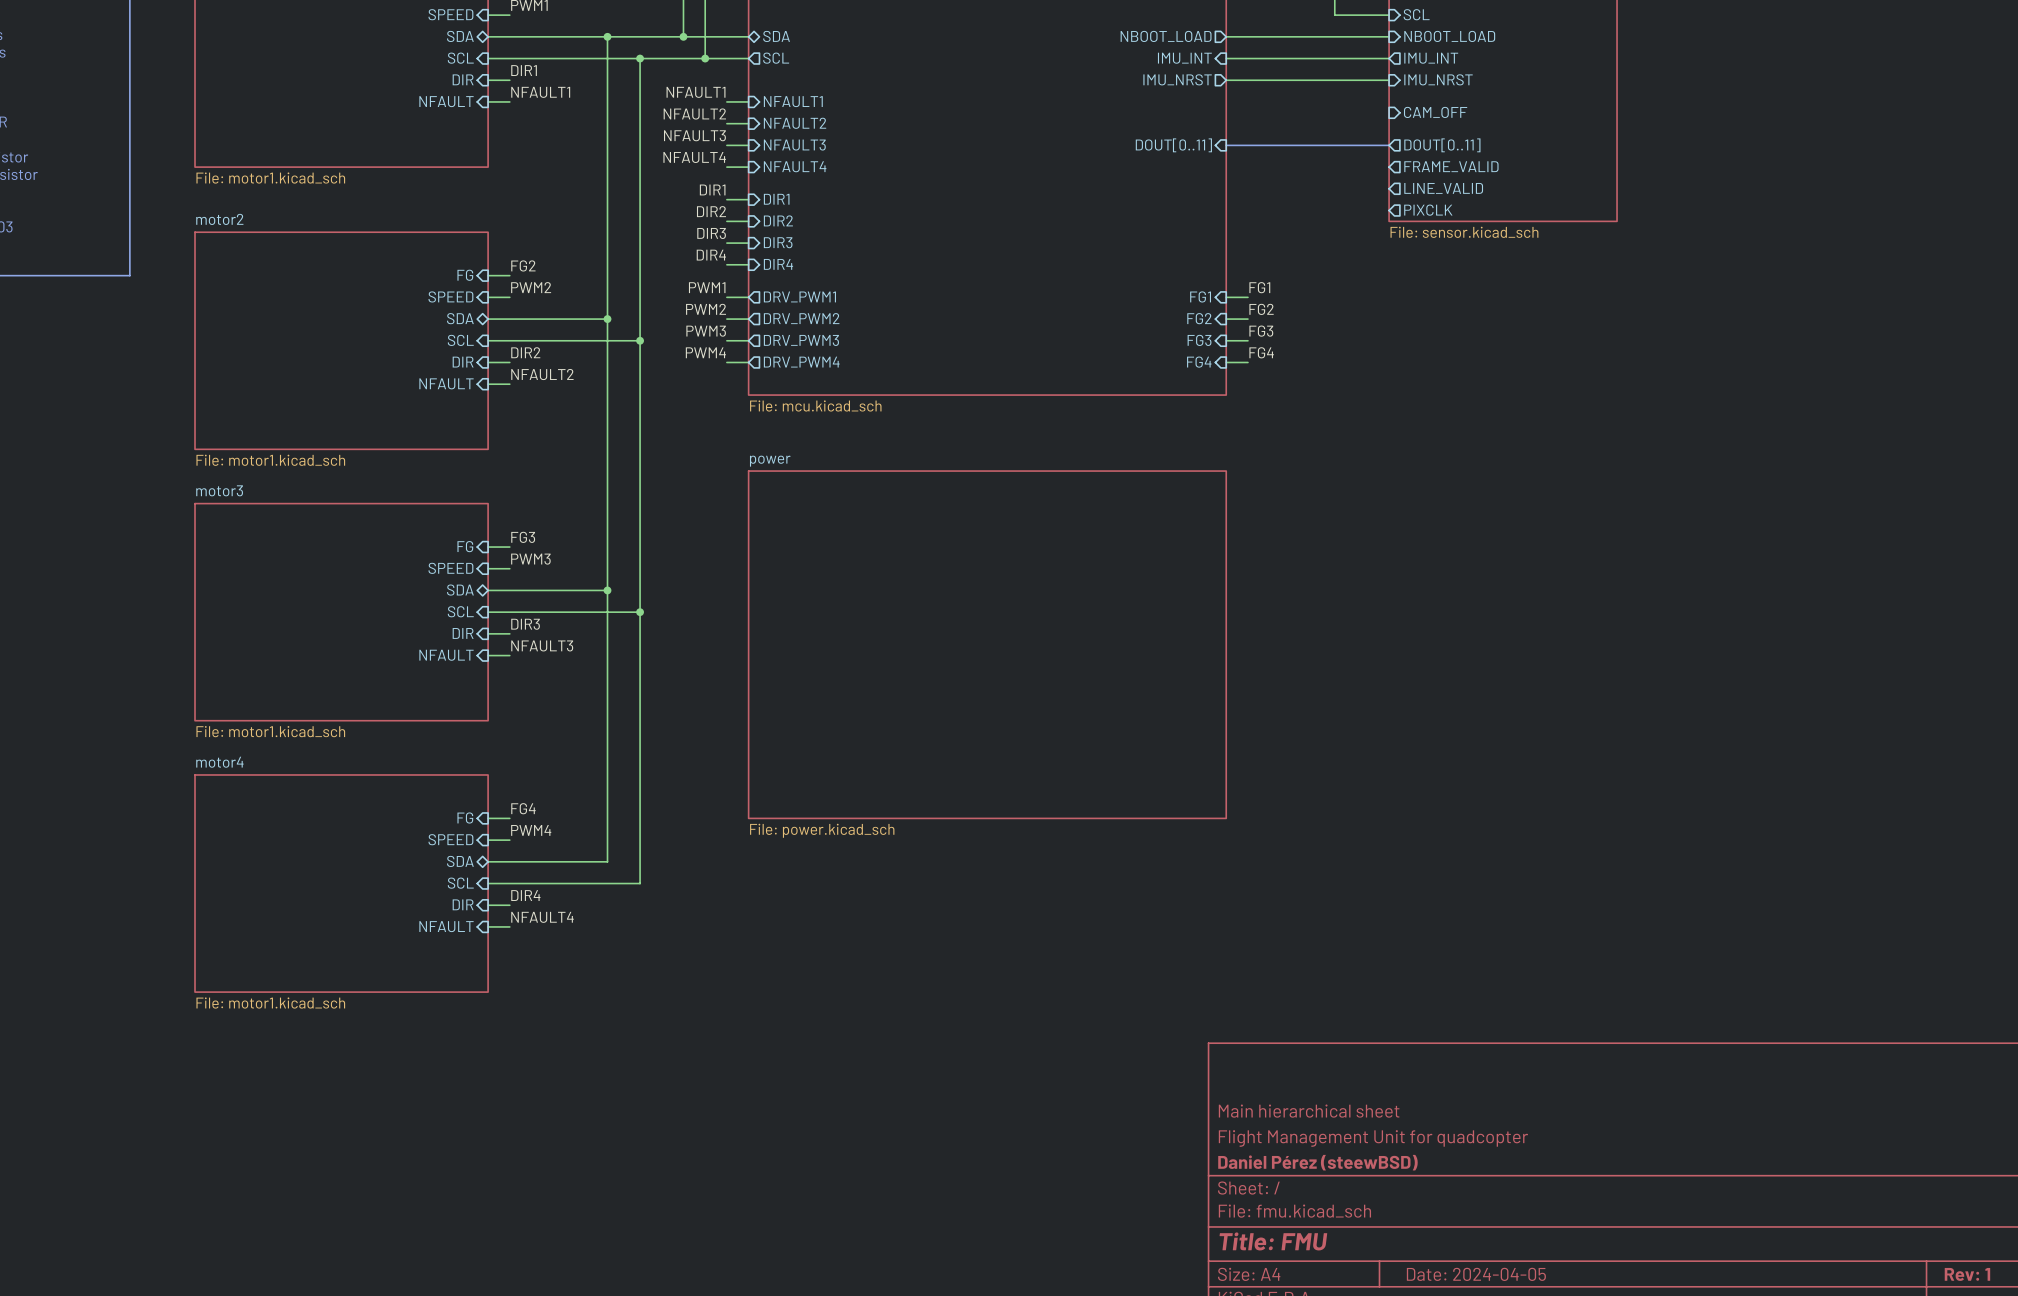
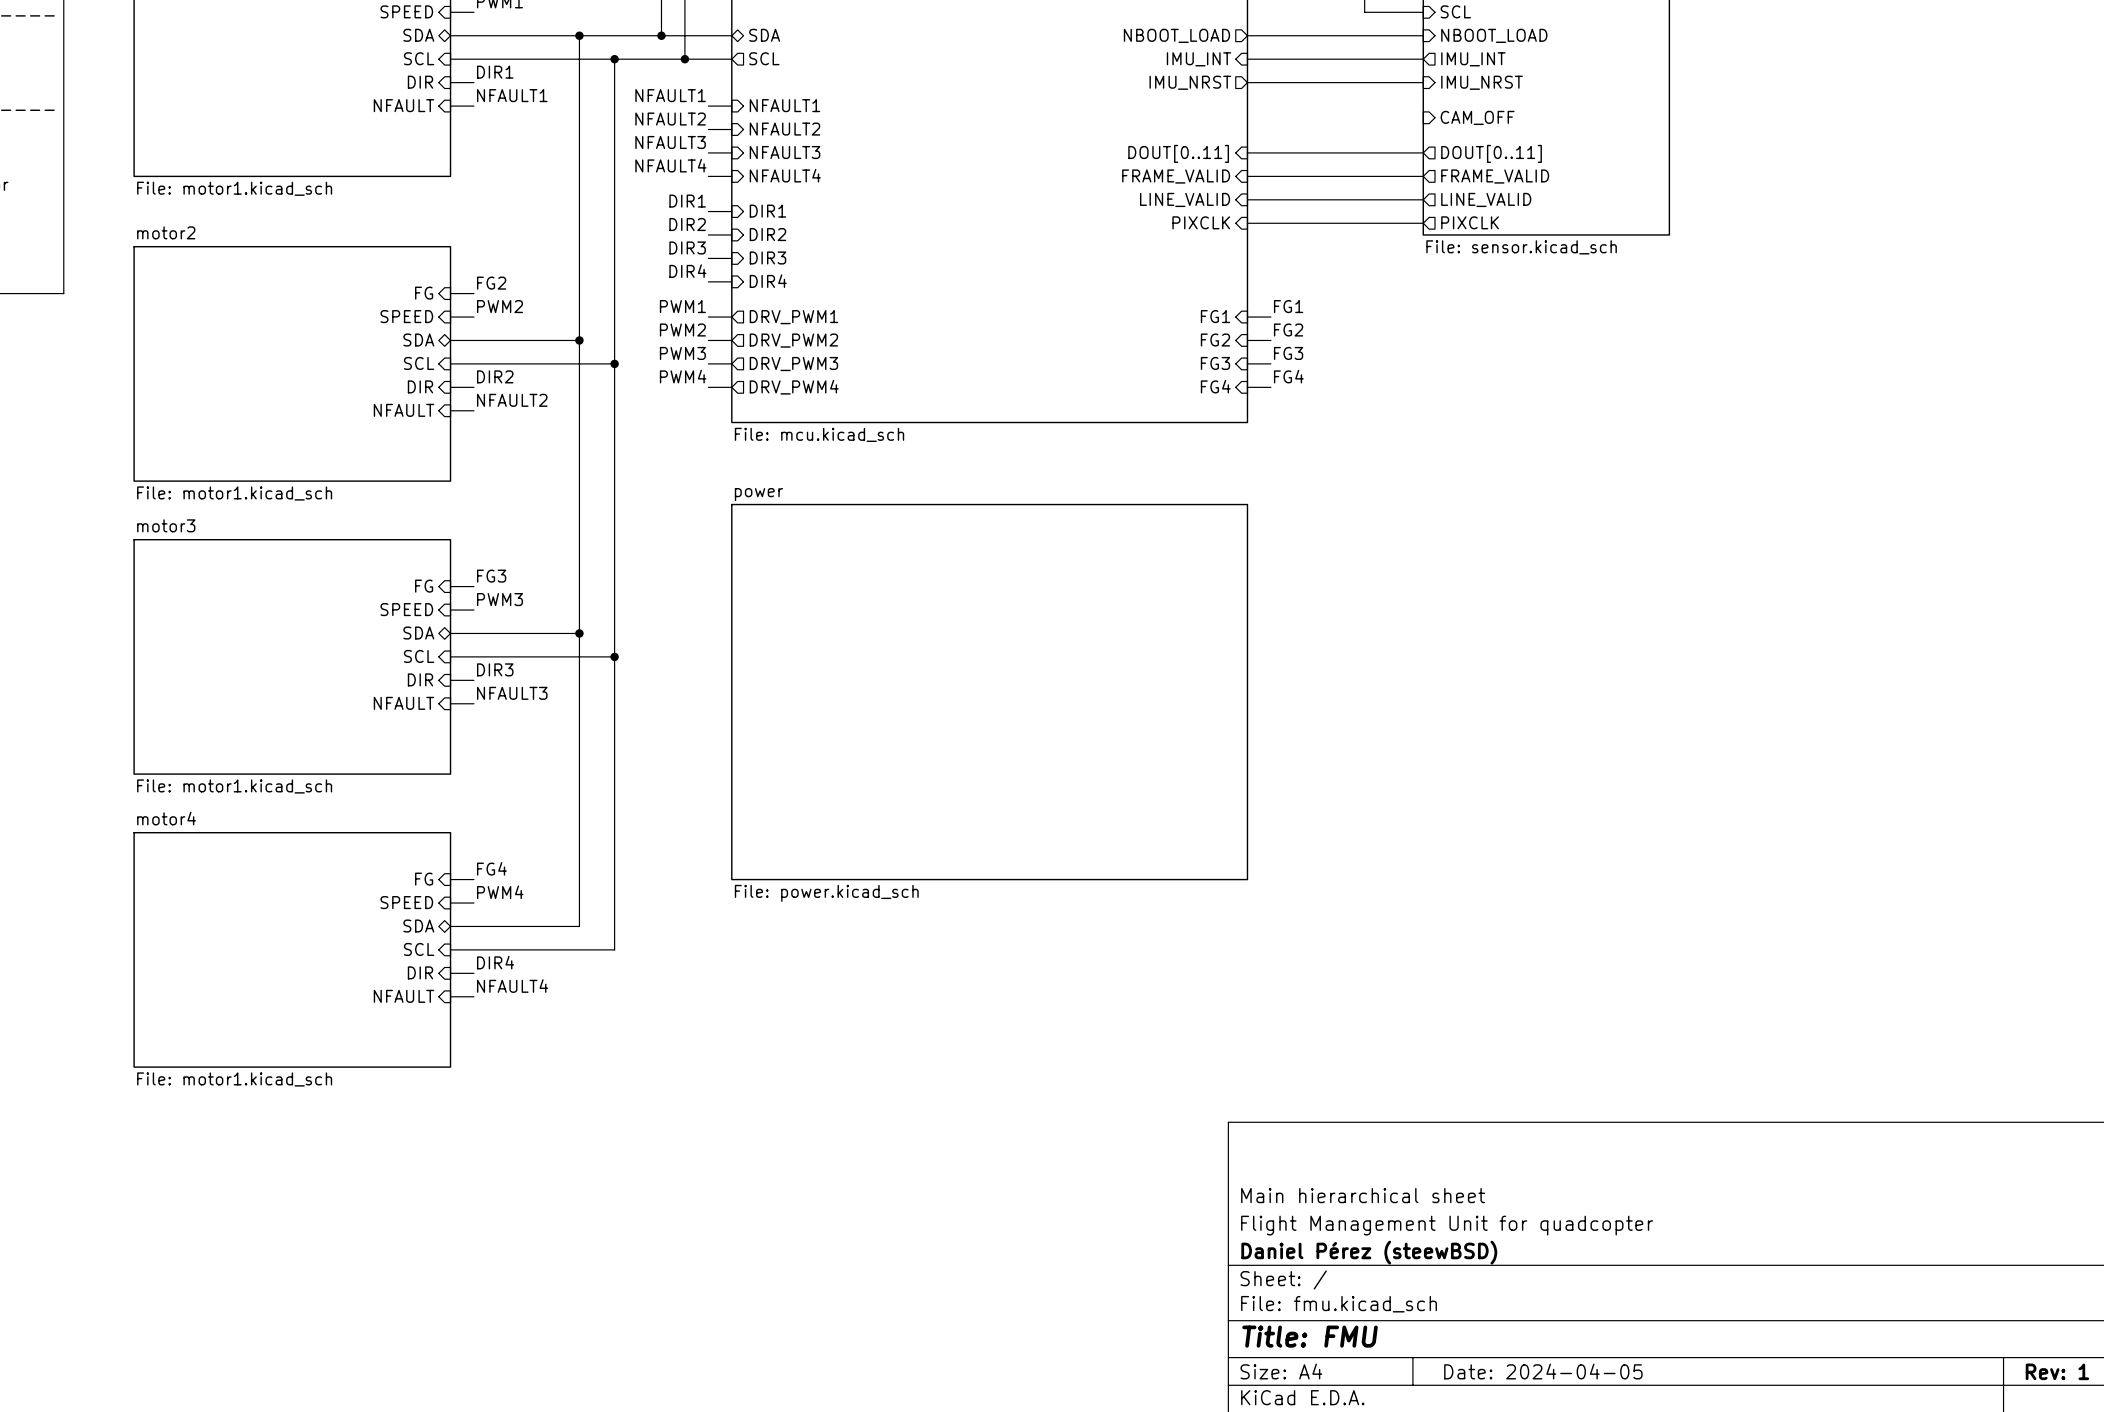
sheet pin: none -> FRAME_VALID (1176, 176)
wire: none -> (1247, 176) (1423, 176)
sheet pin: none -> LINE_VALID (1185, 199)
wire: none -> (1247, 199) (1423, 199)
sheet pin: none -> PIXCLK (1201, 222)
wire: none -> (1247, 223) (1423, 223)

